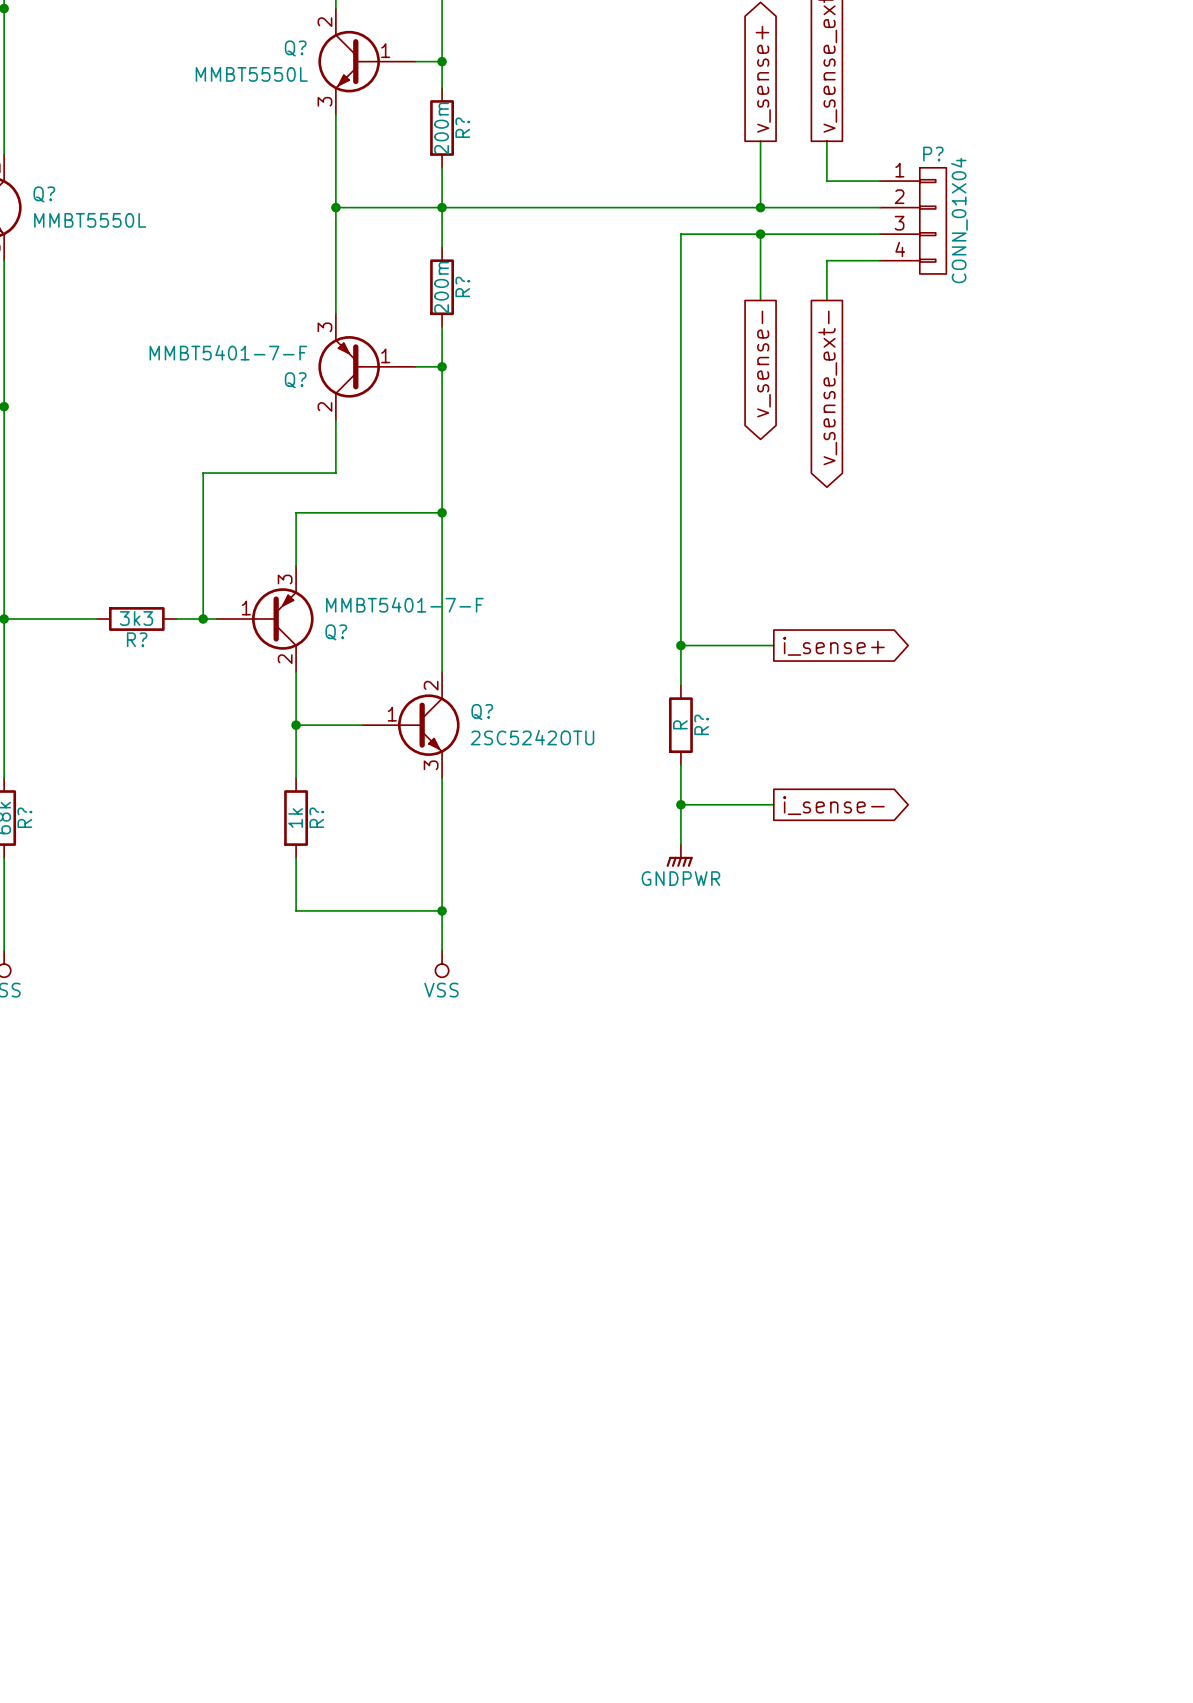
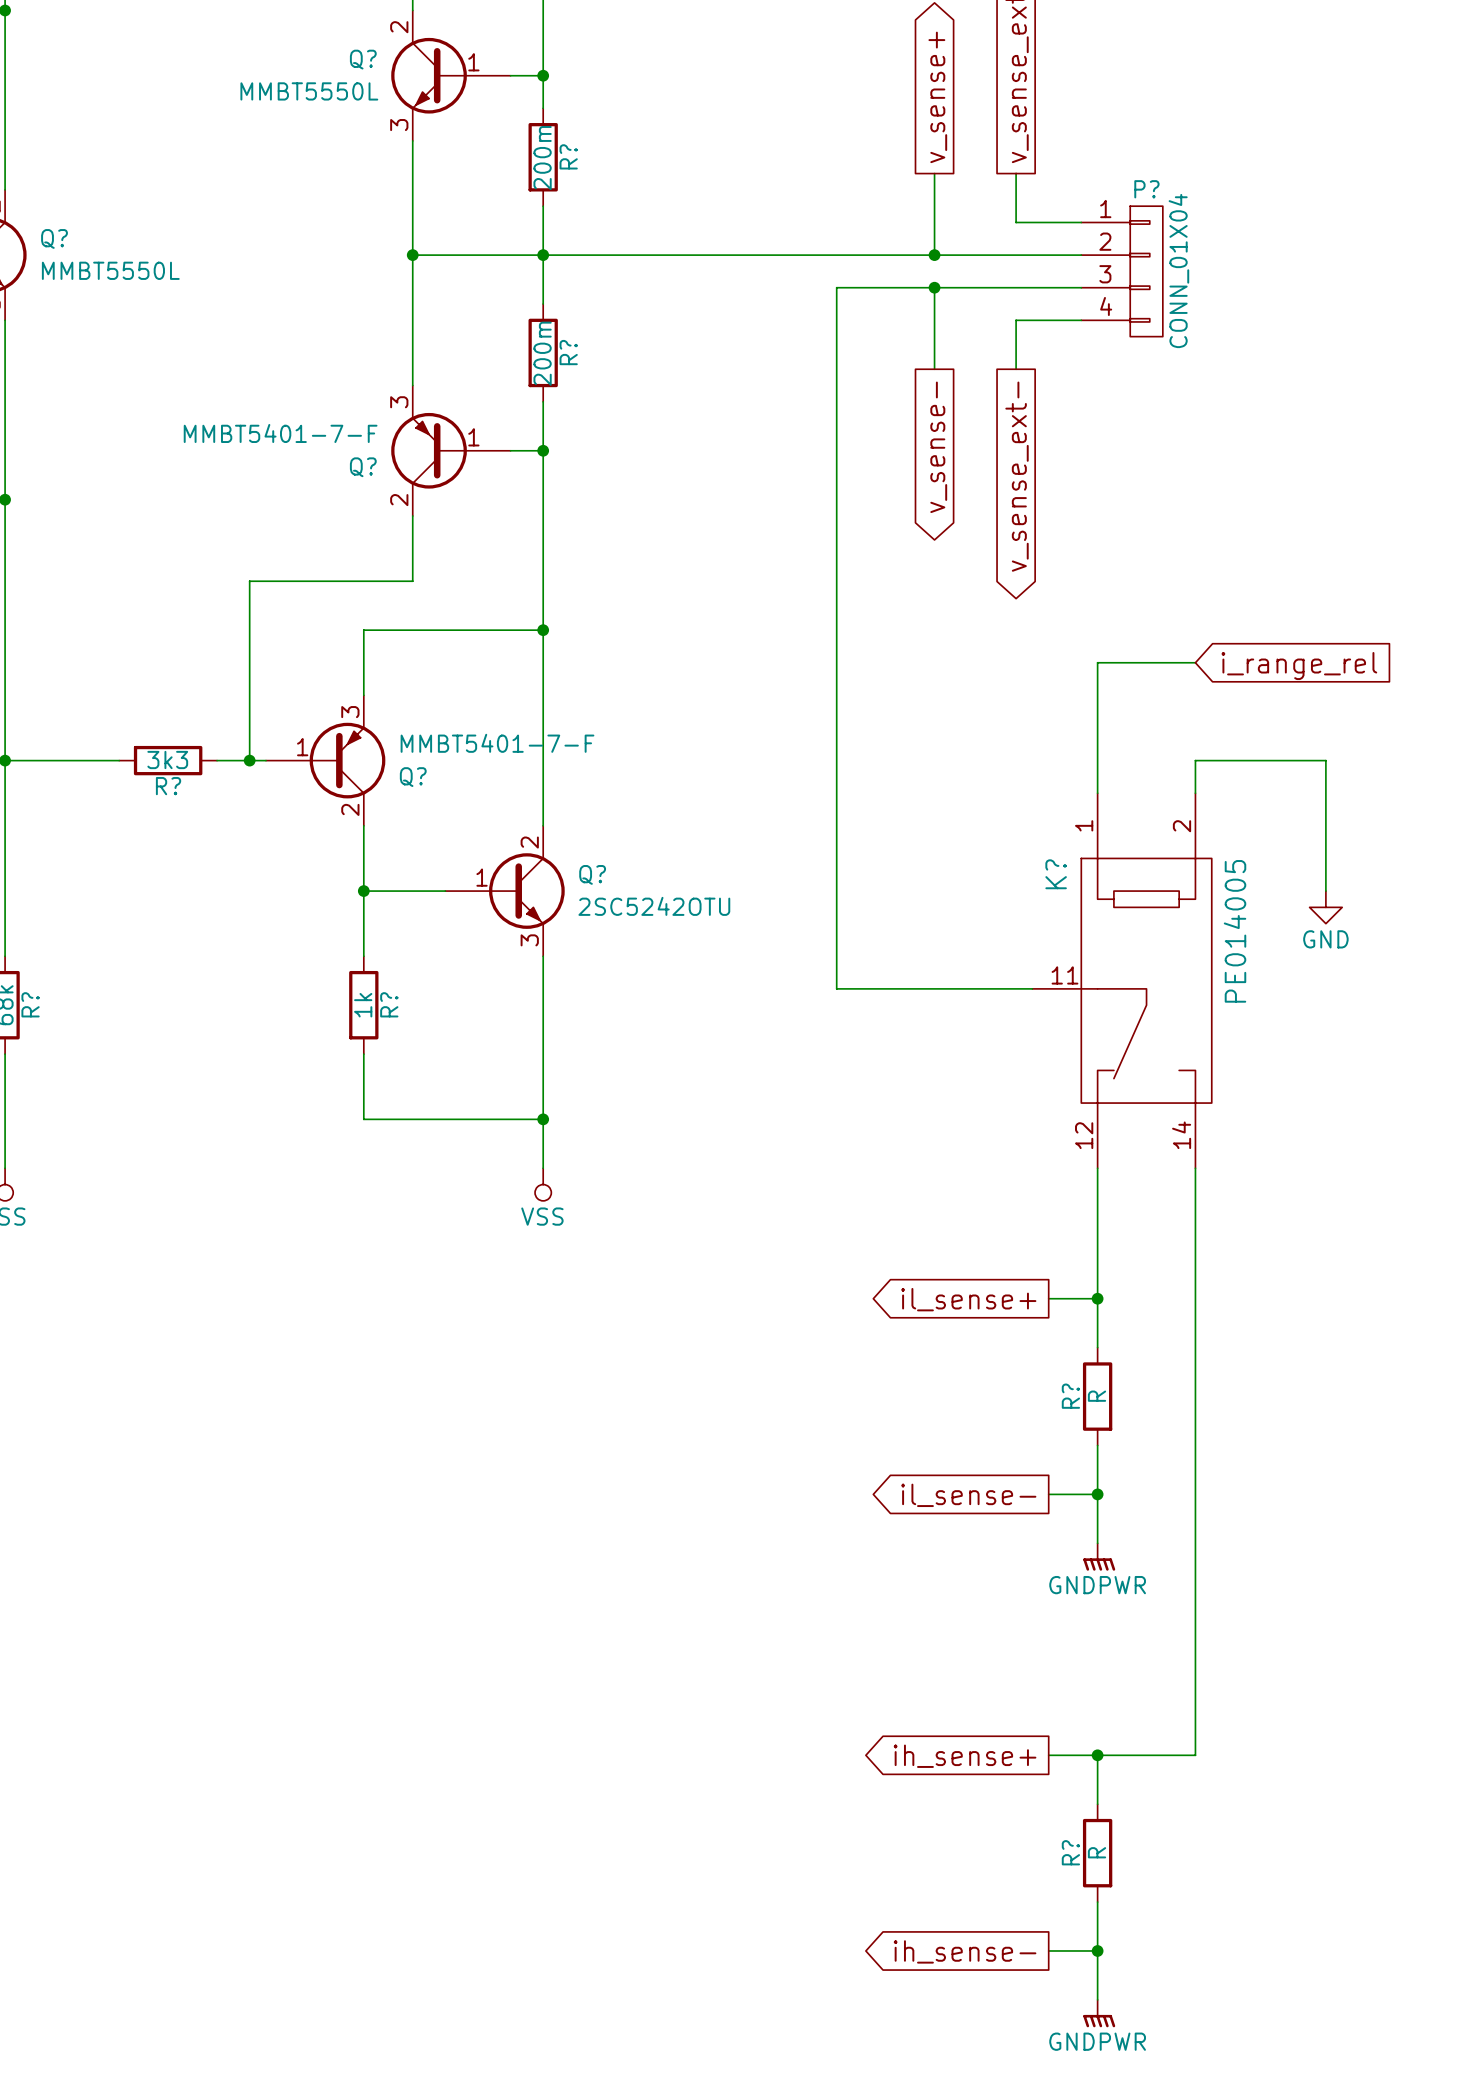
wire: none -> (1195, 662) (1097, 662) (1097, 793)
global label: none -> i_range_rel (1299, 666)
wire: (680, 645) (773, 645) -> none
junction: (680, 645) -> none
wire: none -> (1195, 793) (1195, 760) (1325, 760) (1325, 891)
global label: i_sense+ (833, 646) -> none
wire: none -> (836, 842) (836, 939)
R?: R (680, 725) -> none
power symbol: none -> GND (1325, 907)
K?: none -> PE014005 (1122, 980)
wire: (680, 804) (680, 844) -> none
junction: (680, 804) -> none
wire: none -> (950, 988) (1032, 988)
global label: i_sense- (833, 805) -> none
power symbol: GNDPWR (679, 855) -> none
wire: none -> (1097, 1168) (1097, 1347)
wire: none -> (1195, 1168) (1195, 1755) (1048, 1755)
wire: none -> (1048, 1298) (1097, 1298)
junction: none -> (1097, 1298)
global label: none -> il_sense+ (968, 1299)
R?: none -> R (1097, 1396)
wire: none -> (1097, 1445) (1097, 1543)
global label: none -> il_sense- (968, 1495)
wire: none -> (1048, 1494) (1097, 1494)
junction: none -> (1097, 1494)
power symbol: none -> GNDPWR (1099, 1557)
wire: none -> (1097, 1755) (1097, 1804)
junction: none -> (1097, 1755)
global label: none -> ih_sense+ (965, 1756)
R?: none -> R (1097, 1853)
wire: none -> (1097, 1902) (1097, 1999)
wire: none -> (1048, 1950) (1097, 1950)
junction: none -> (1097, 1950)
global label: none -> ih_sense- (965, 1951)
power symbol: none -> GNDPWR (1099, 2013)

